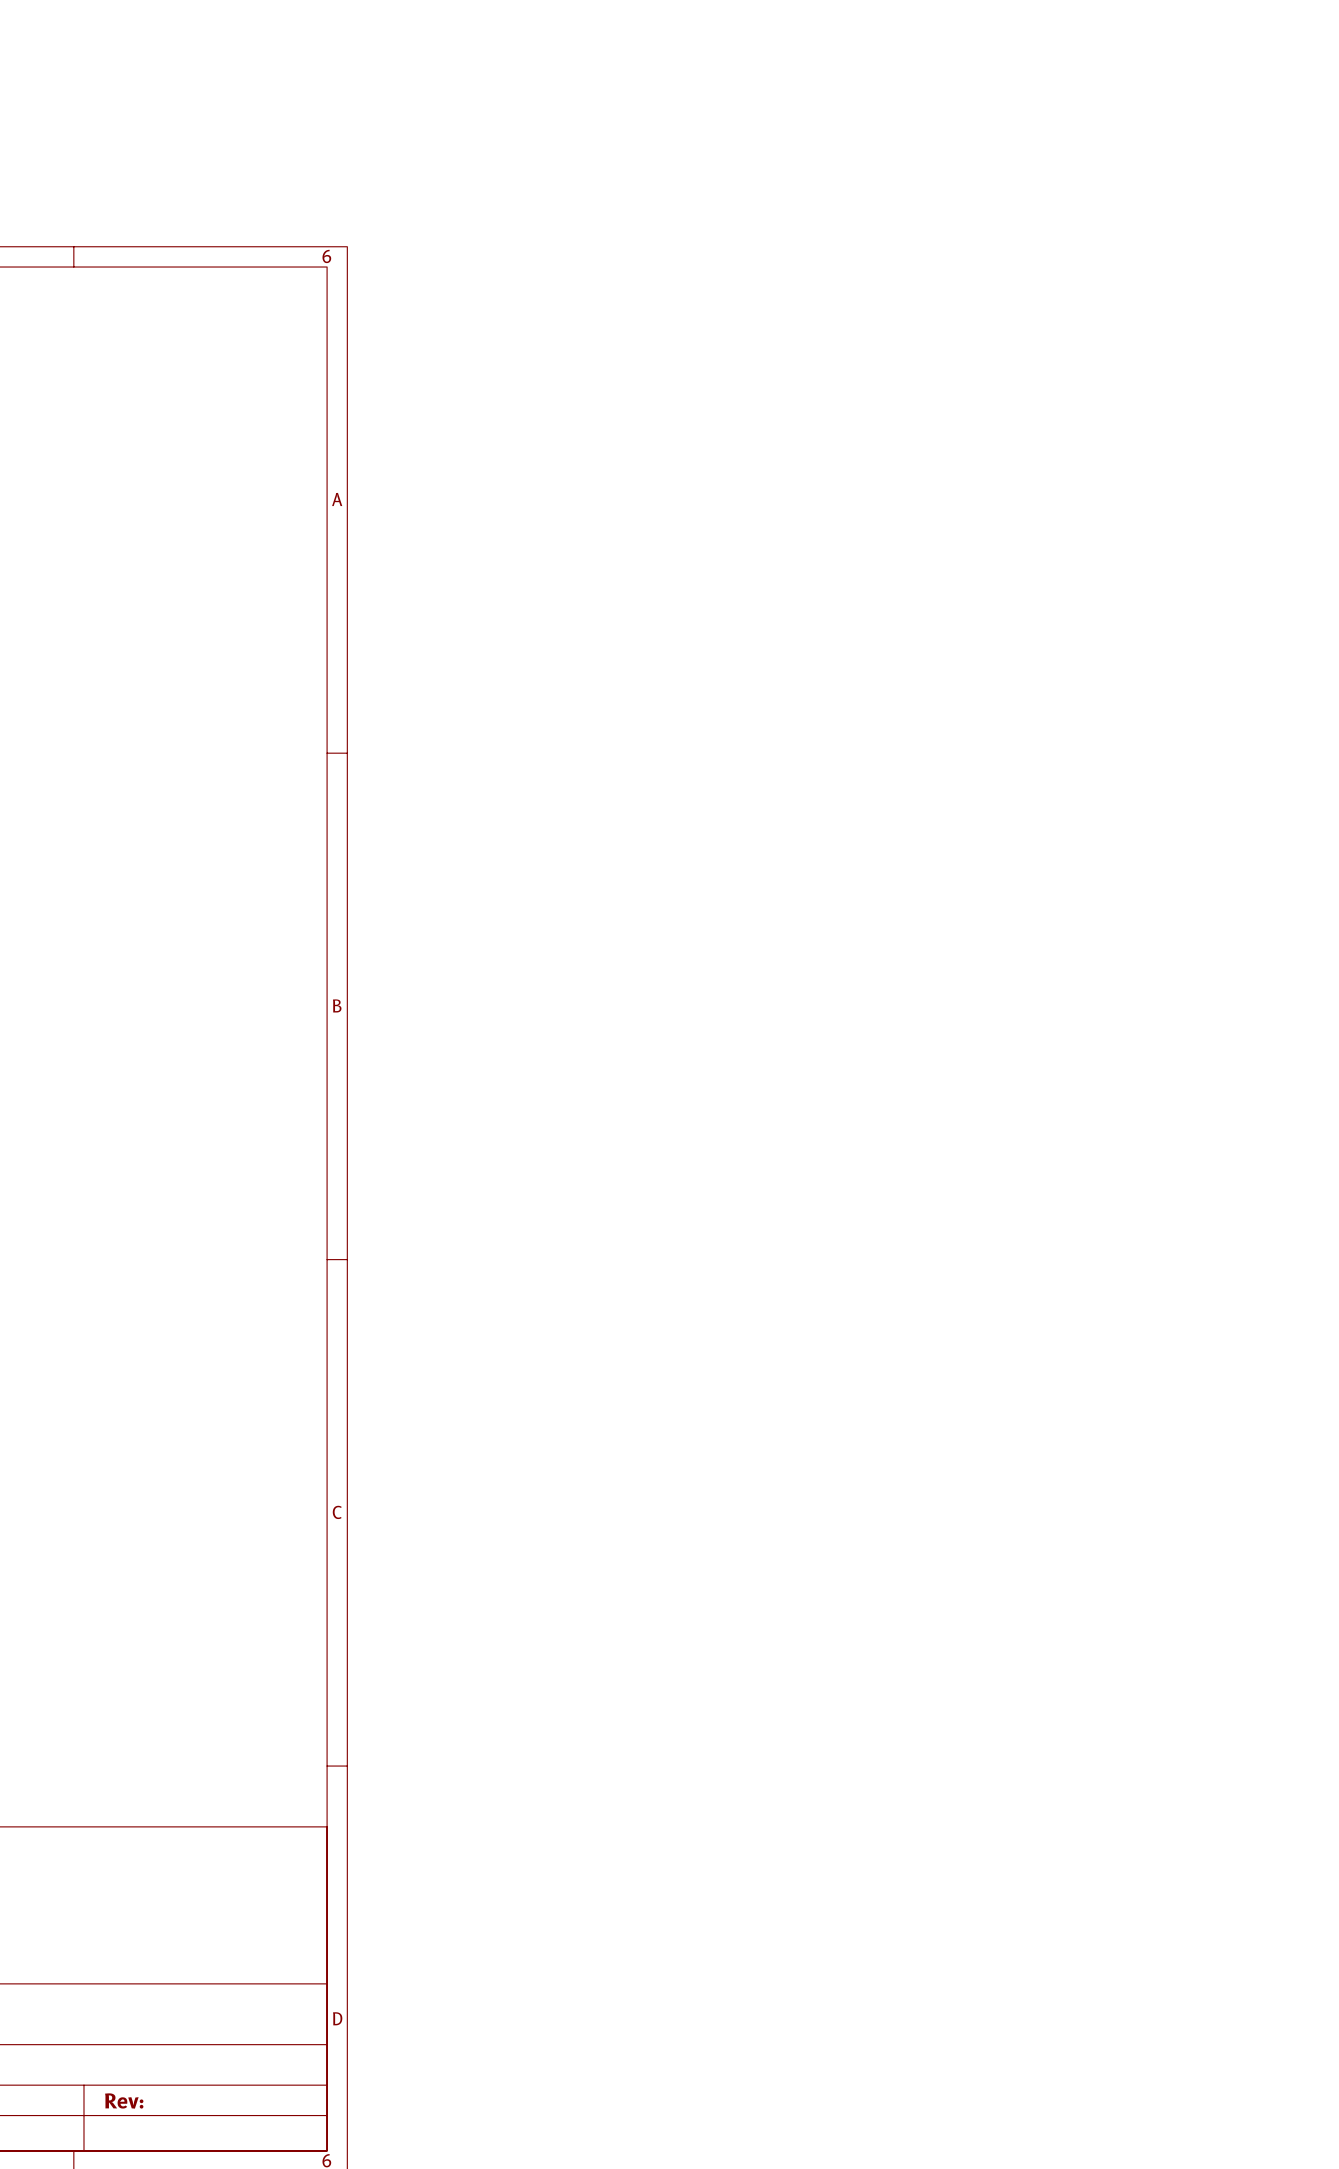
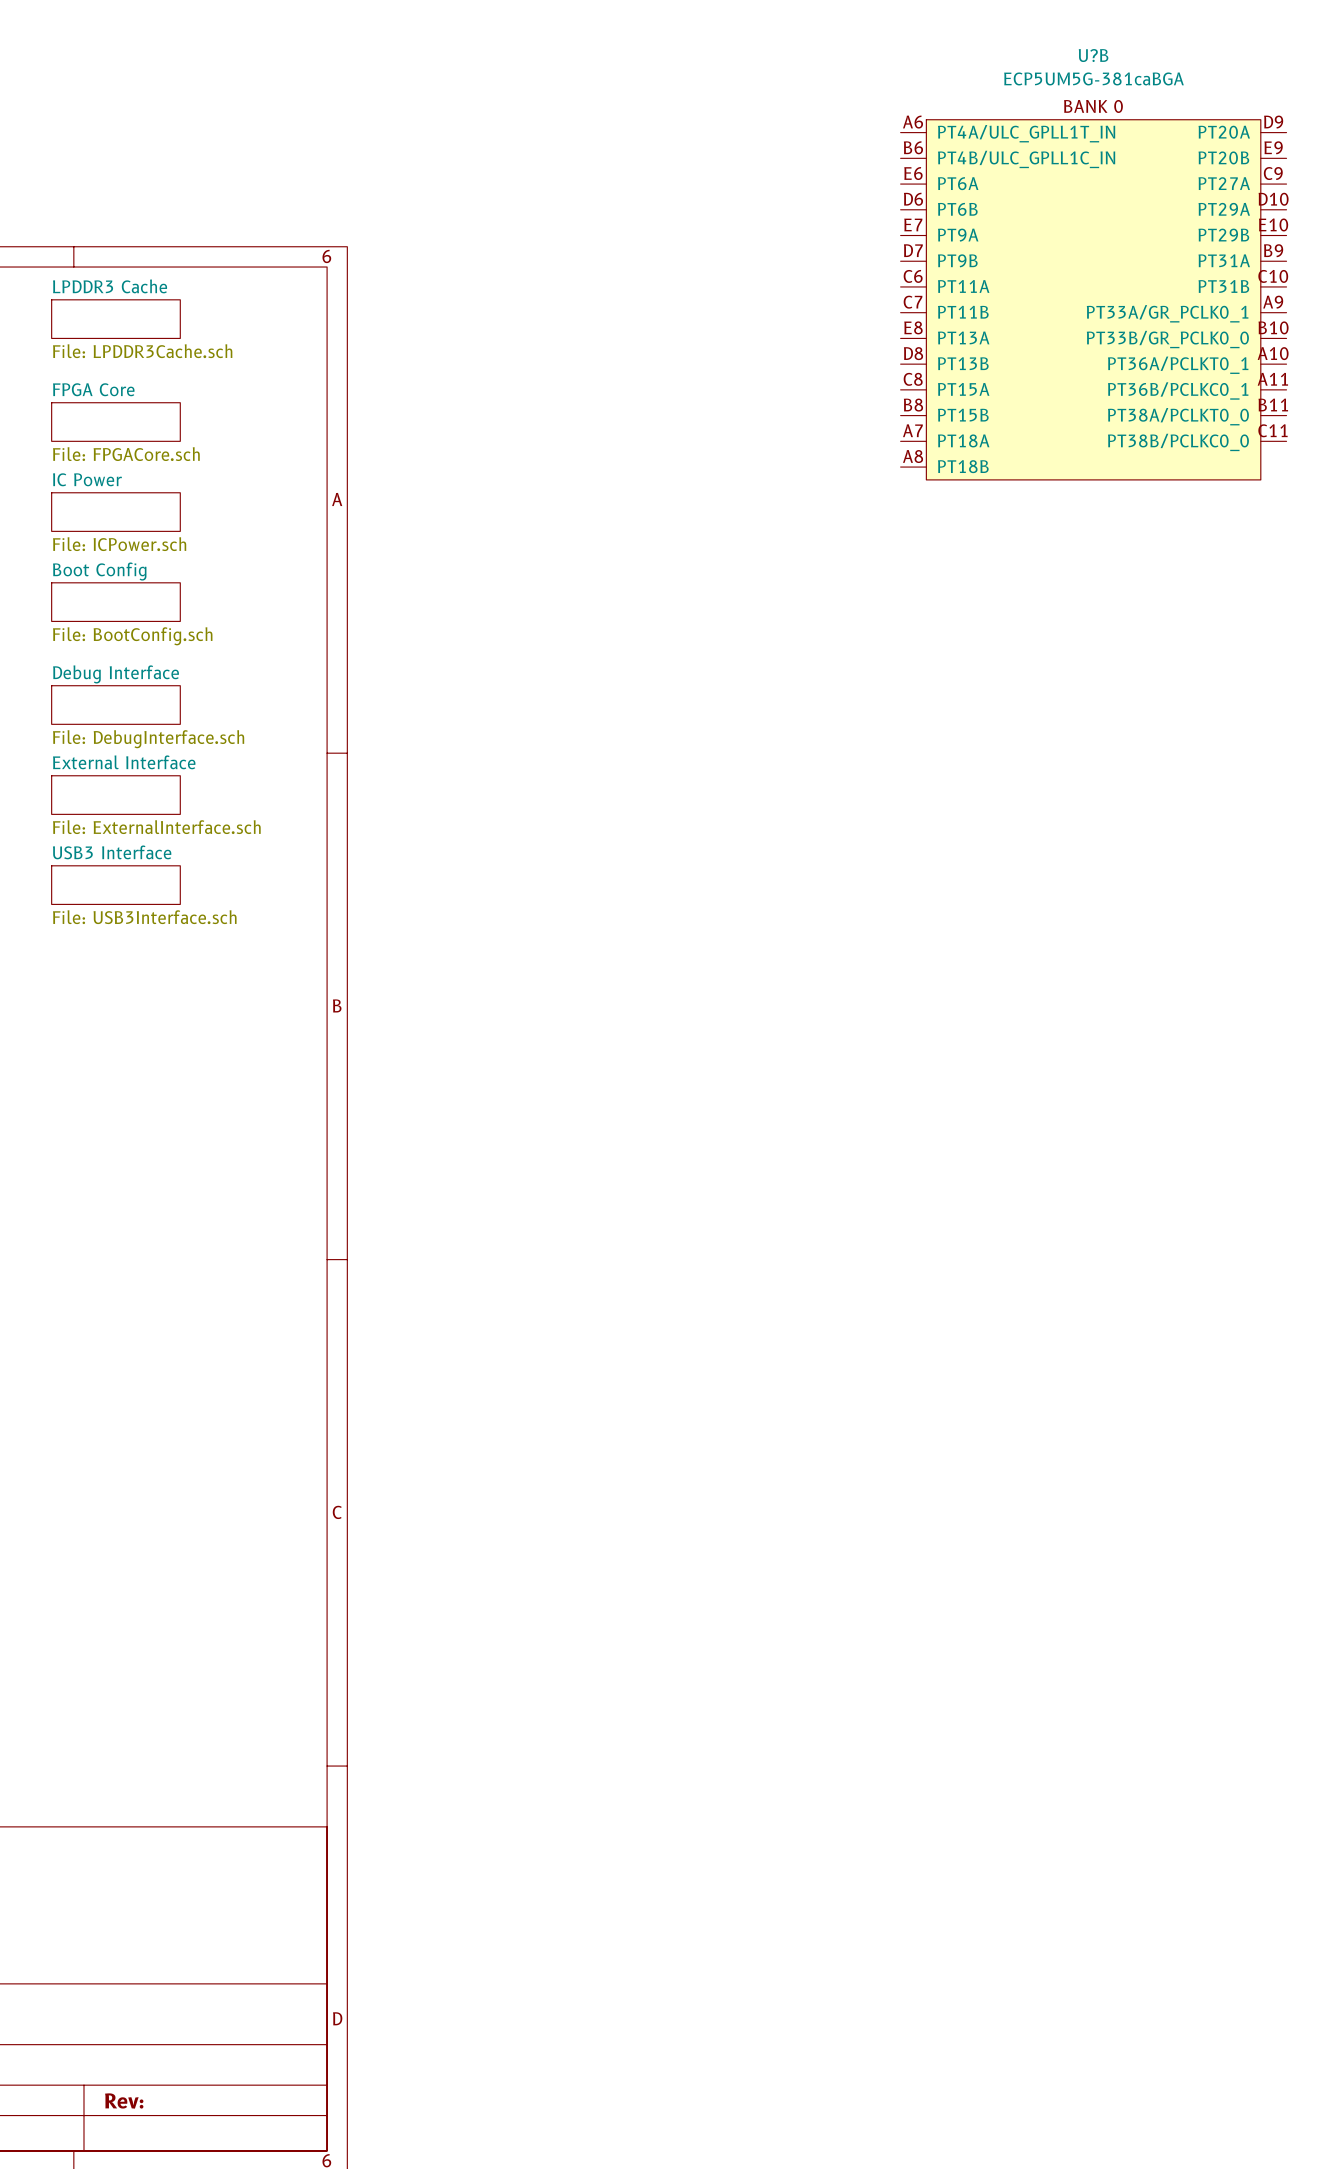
U?B: none -> ECP5UM5G-381caBGA (1093, 299)
sheet LPDDR3 Cache: none -> File: LPDDR3Cache.sch (115, 319)
sheet FPGA Core: none -> File: FPGACore.sch (115, 422)
sheet IC Power: none -> File: ICPower.sch (115, 512)
sheet Boot Config: none -> File: BootConfig.sch (115, 602)
sheet Debug Interface: none -> File: DebugInterface.sch (115, 705)
sheet External Interface: none -> File: ExternalInterface.sch (115, 795)
sheet USB3 Interface: none -> File: USB3Interface.sch (115, 885)

